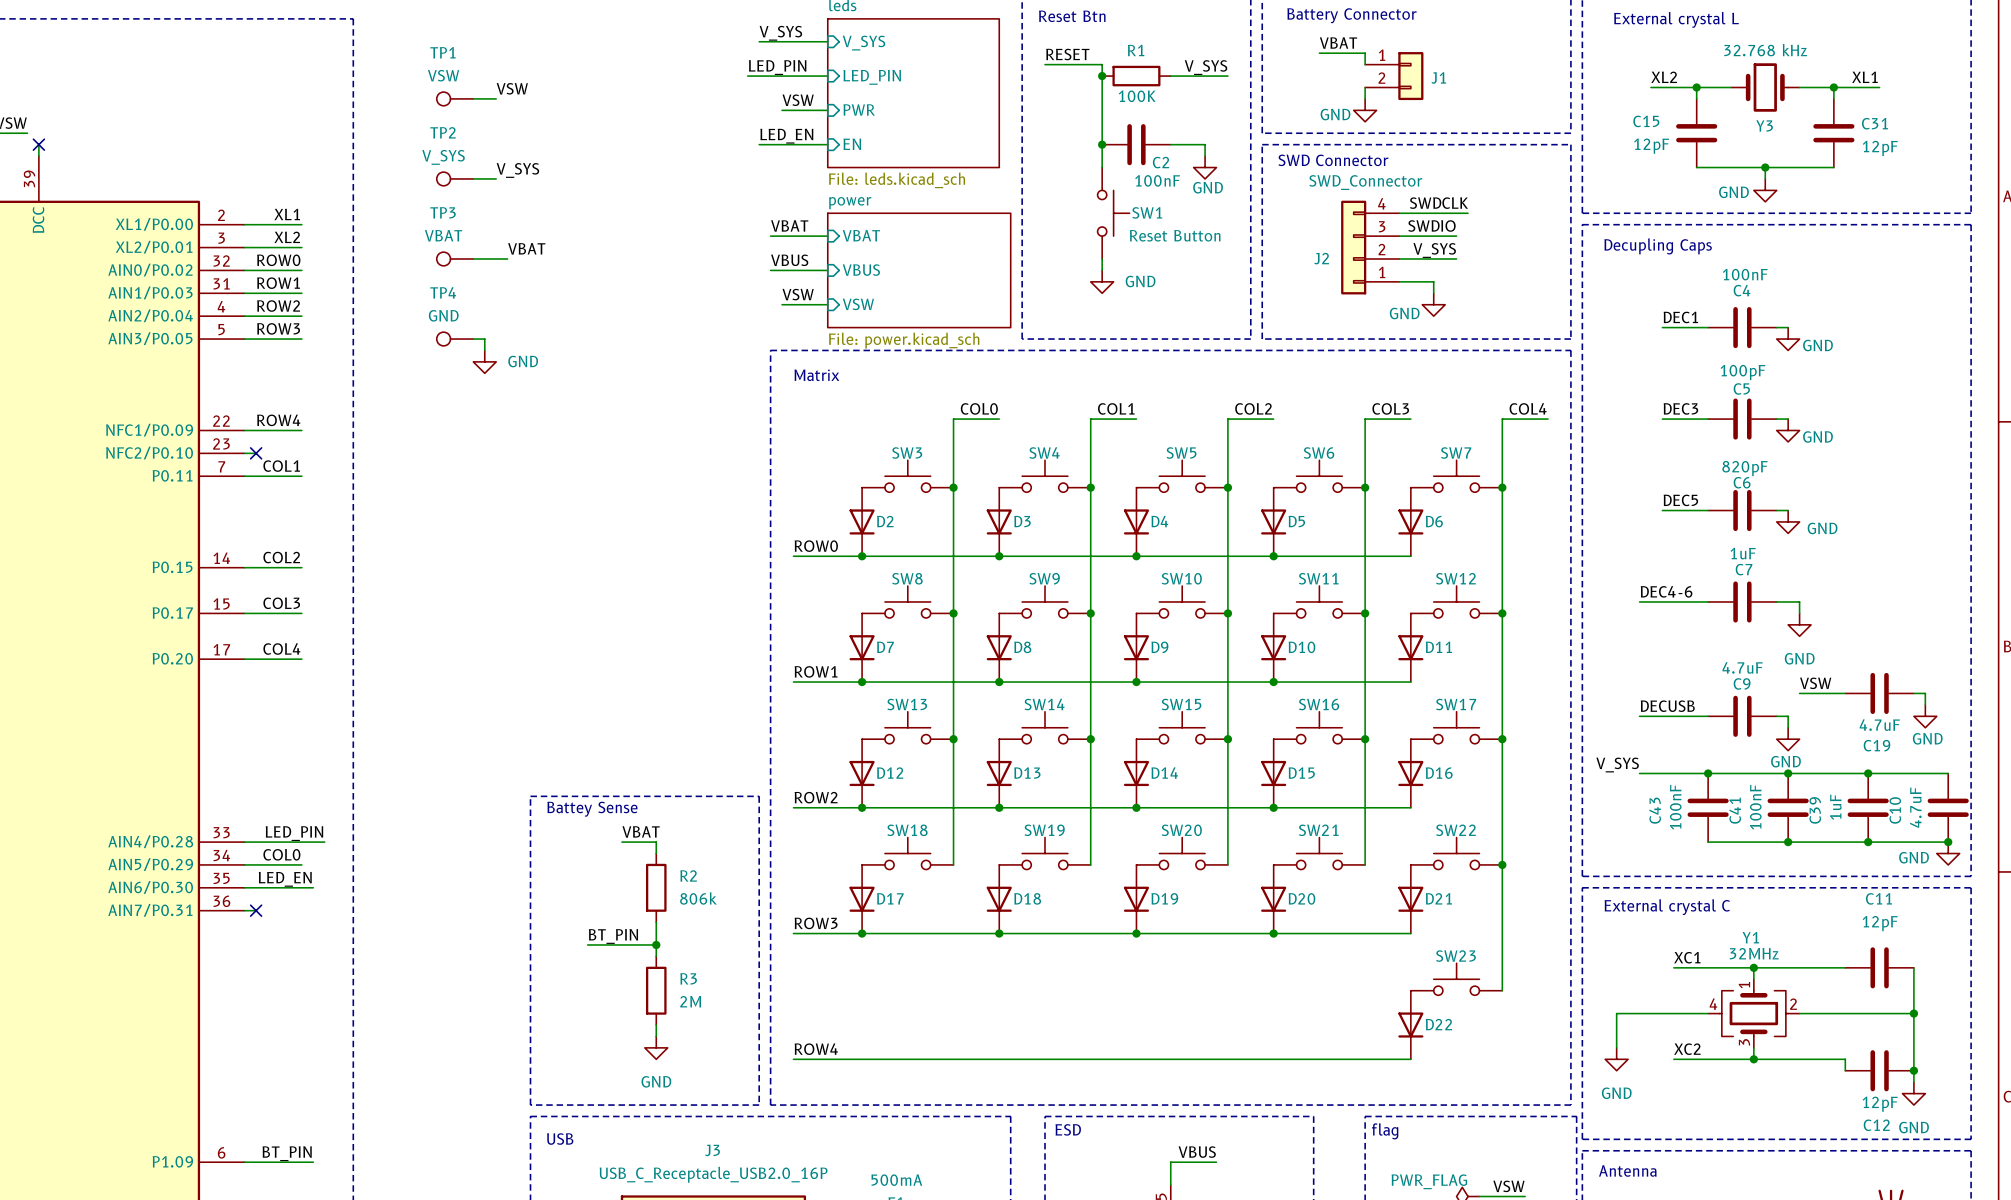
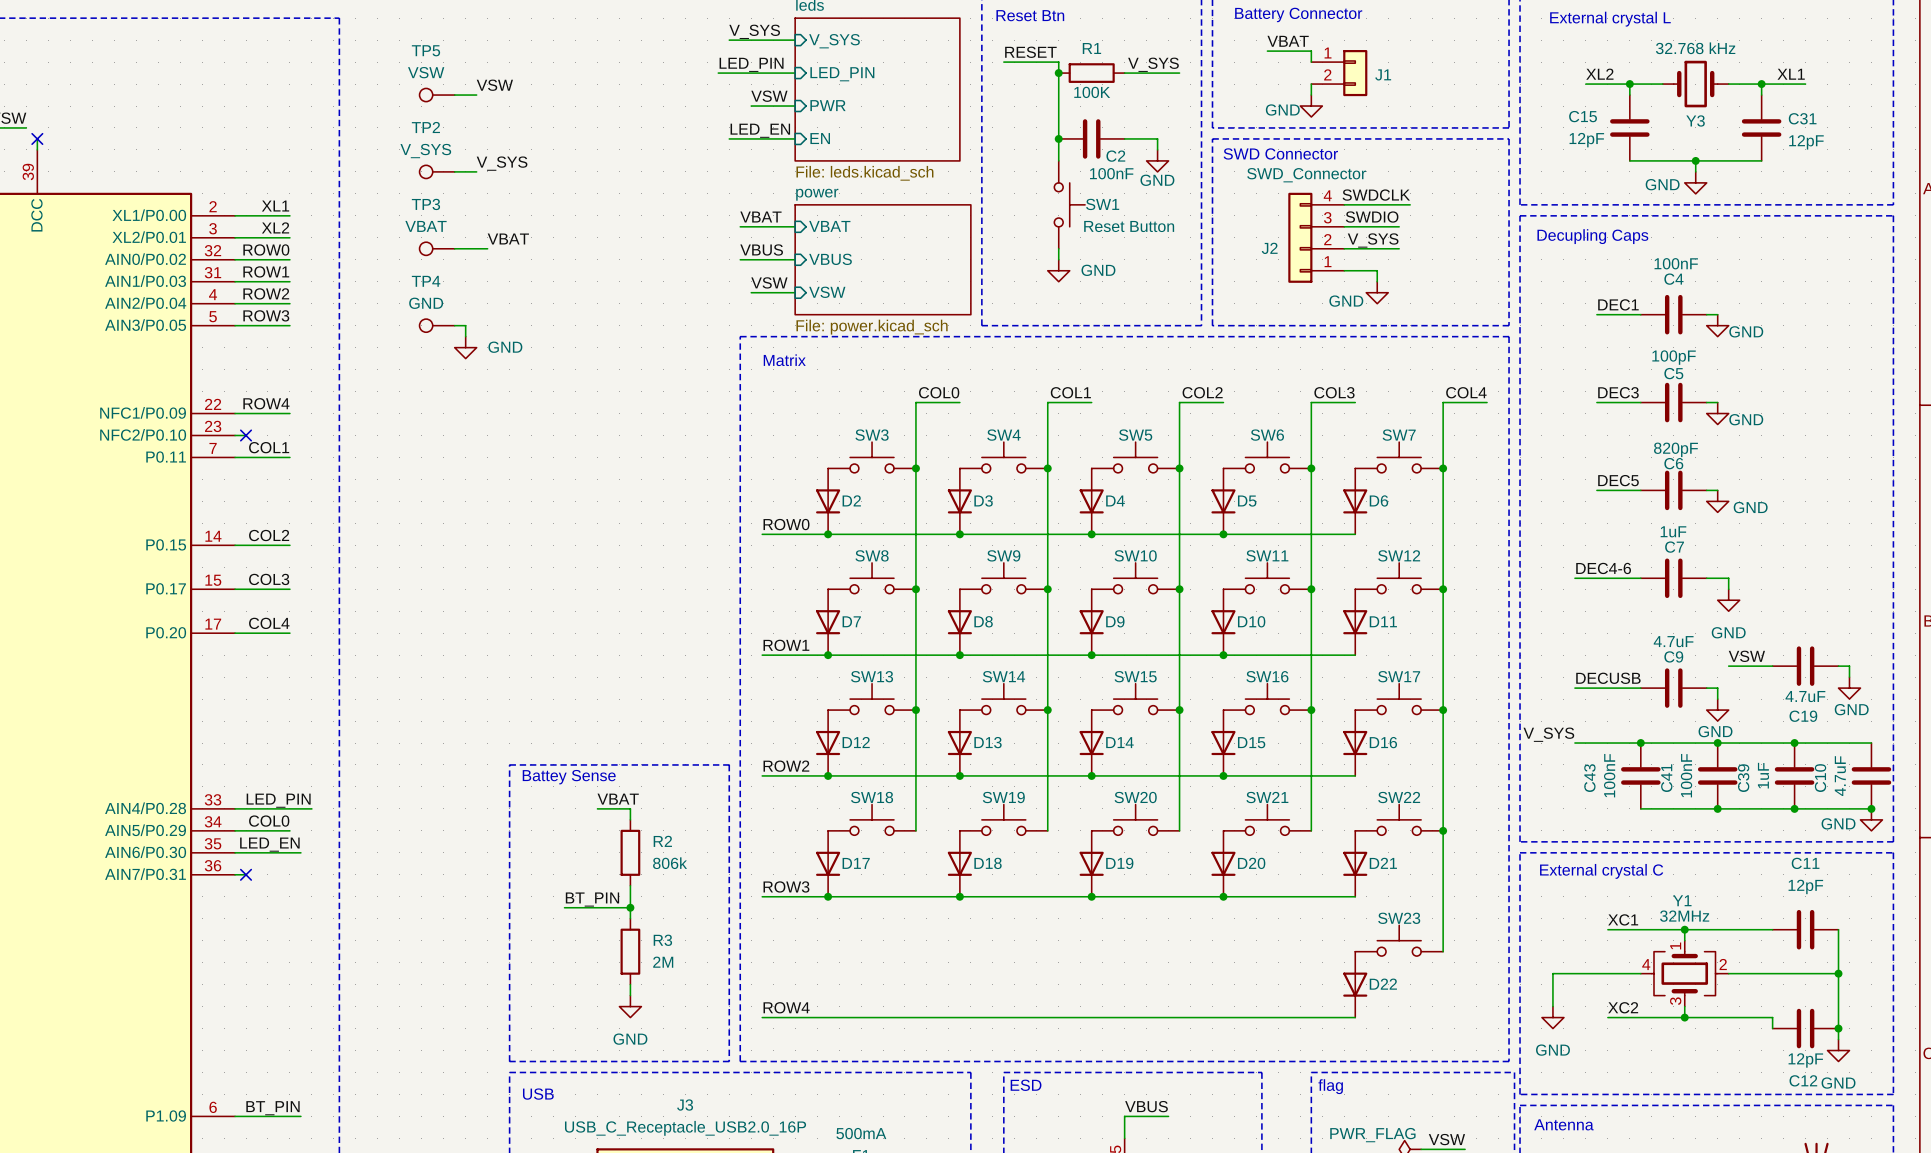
TP1 name: TP1 (442, 52) -> TP5 (425, 50)

